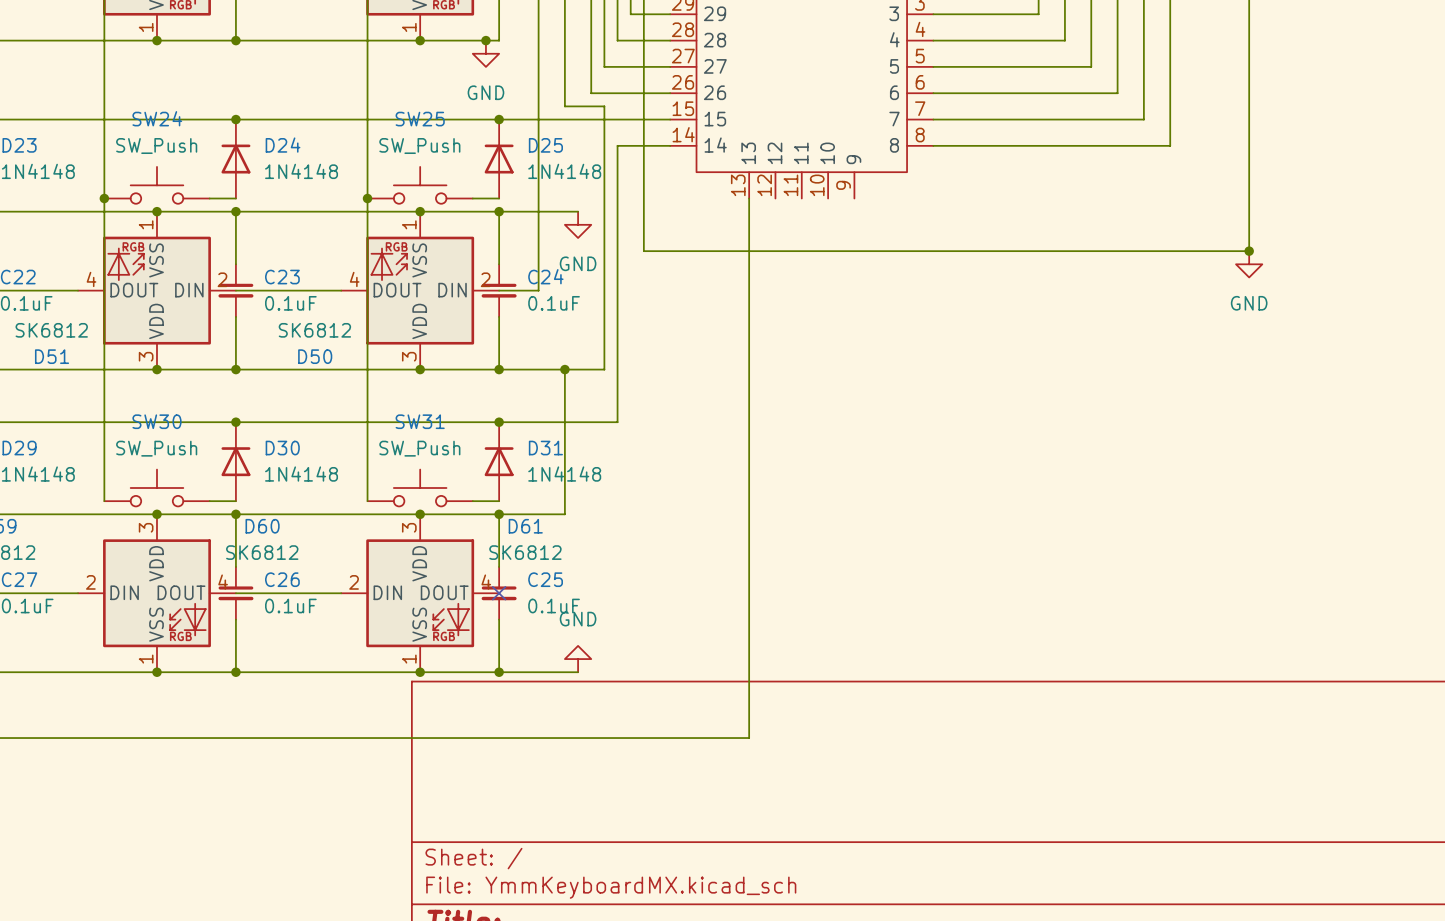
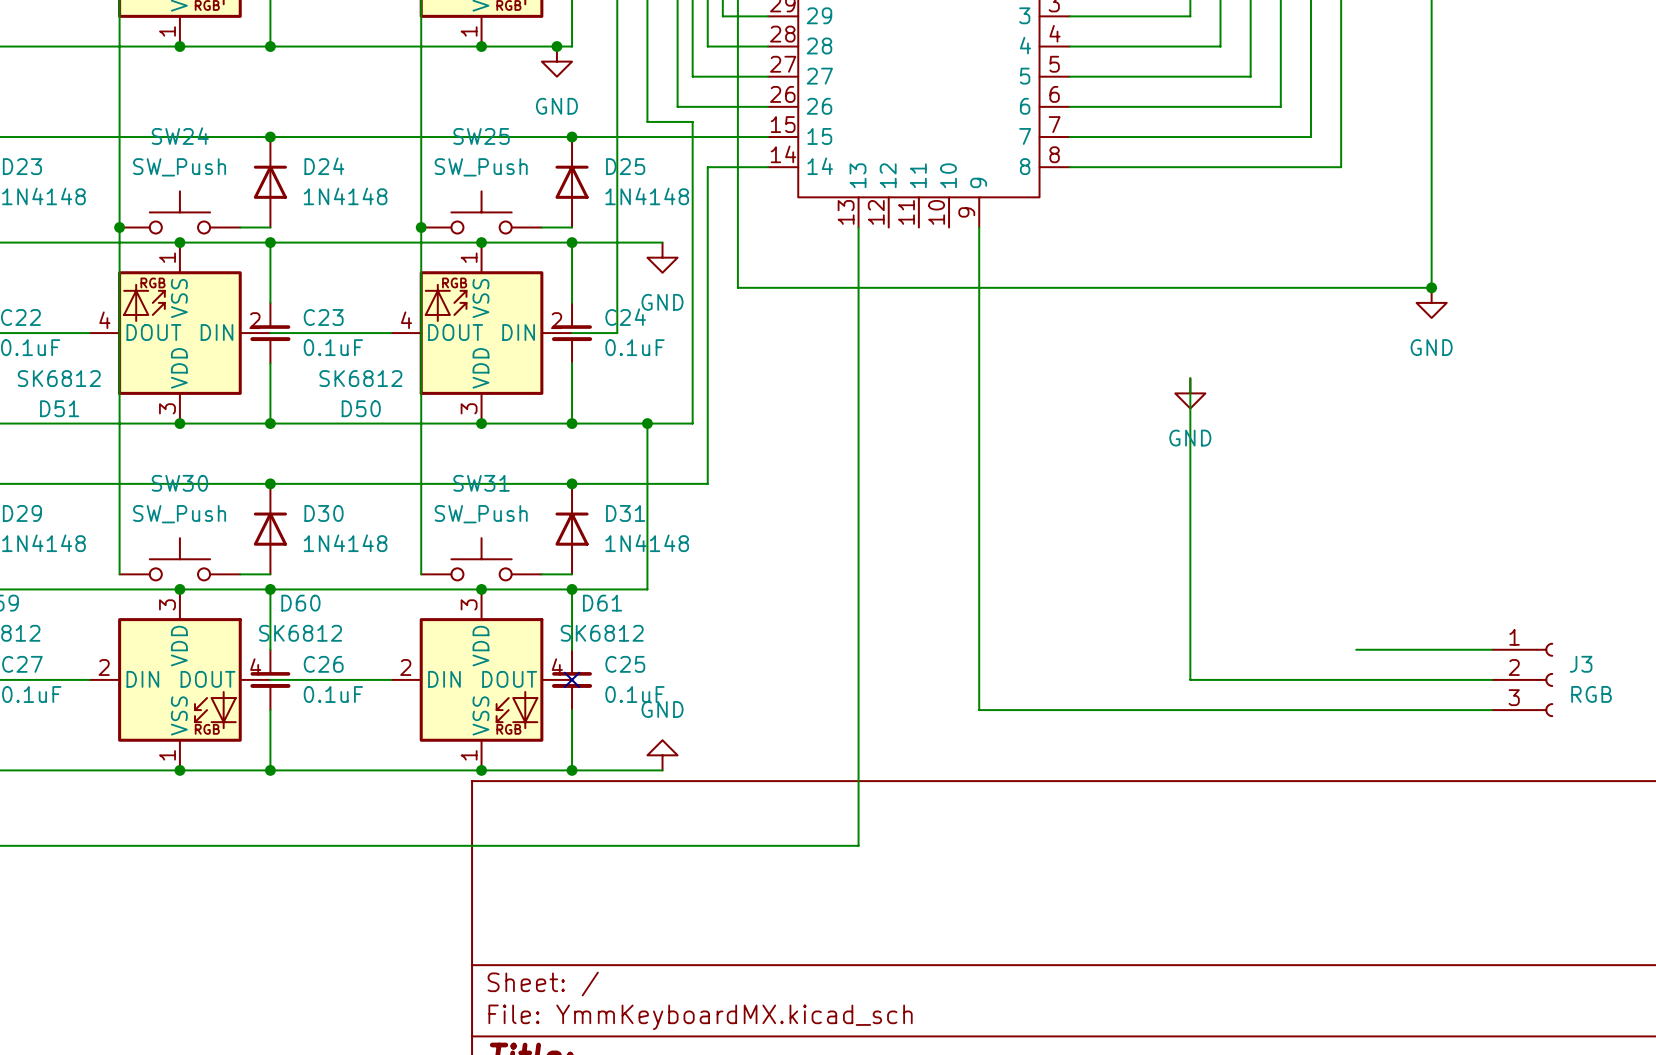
wire: none -> (979, 227) (979, 710) (1491, 710)
wire: none -> (1190, 378) (1190, 679) (1491, 679)
power symbol: none -> GND (1190, 393)
wire: none -> (1356, 649) (1491, 649)
J3: none -> RGB (1522, 679)

